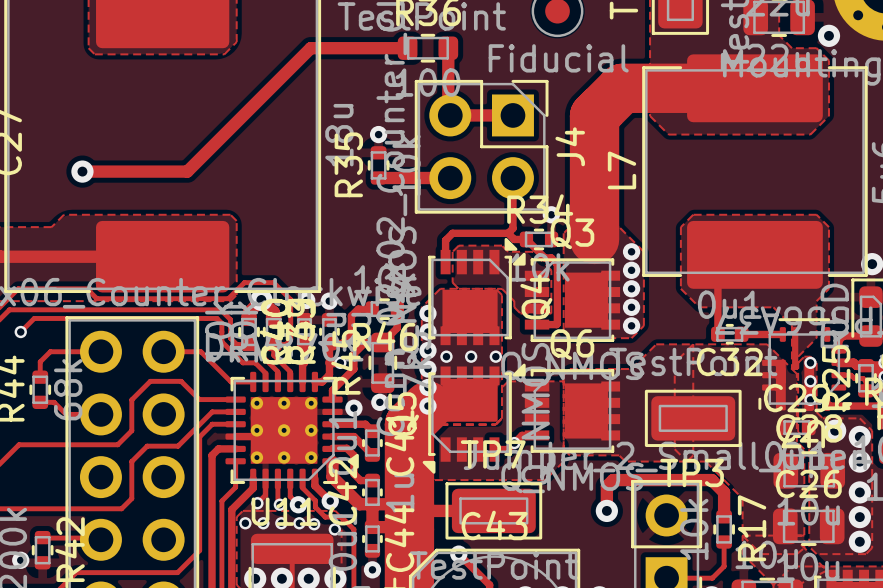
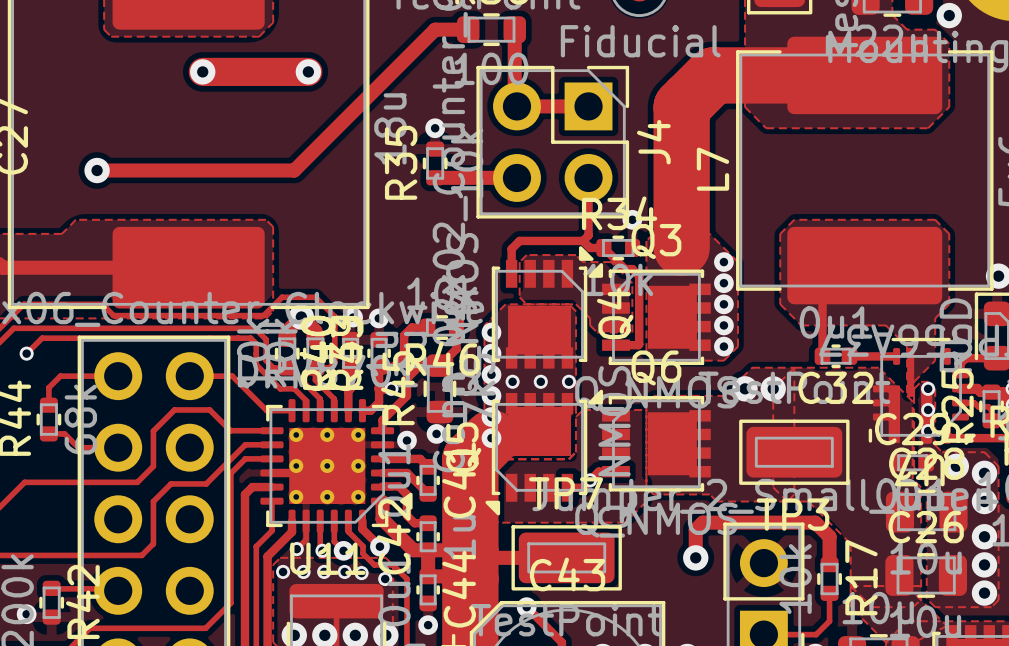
track: (378, 48) (310, 48) (187, 171) -> (435, 29) (294, 170) (216, 170)
track: none -> (202, 71) (308, 71)
via: none -> (202, 71)
via: none -> (308, 71)
via: none -> (745, 388)
via: none -> (773, 388)

